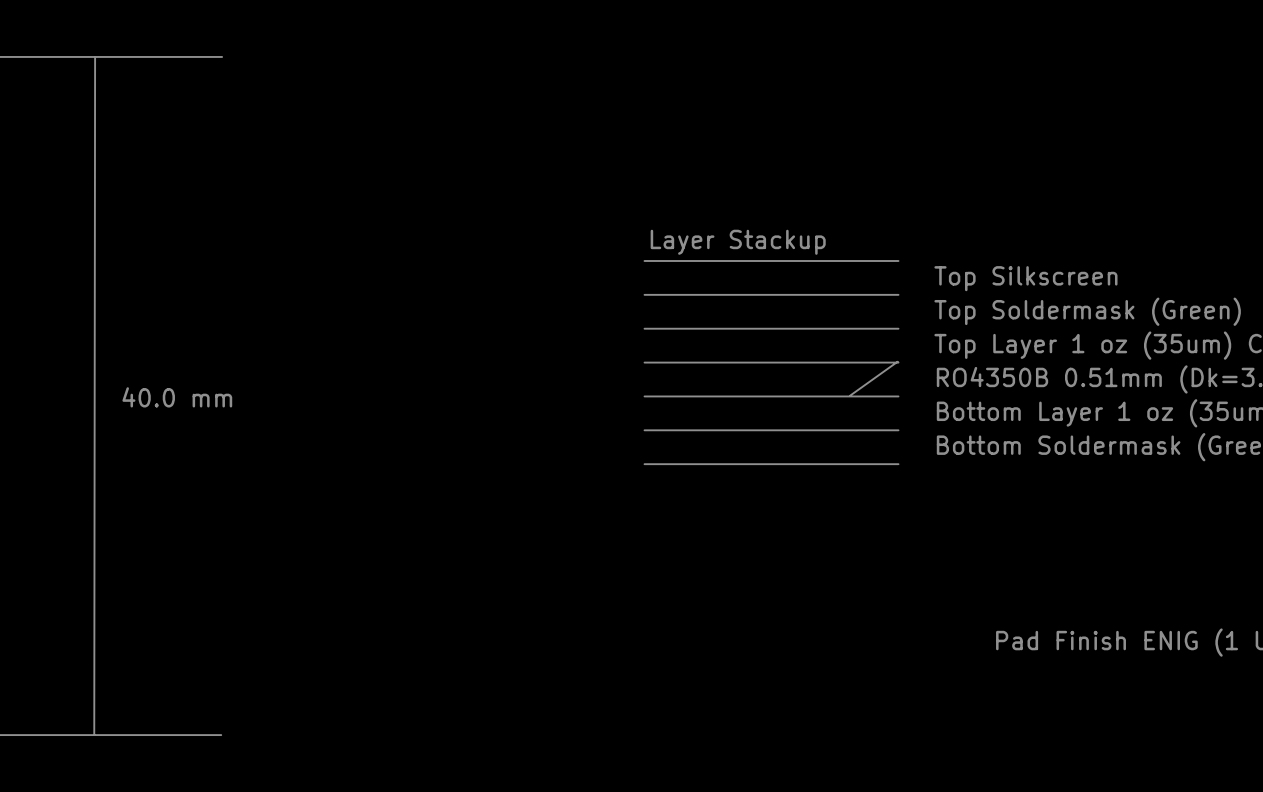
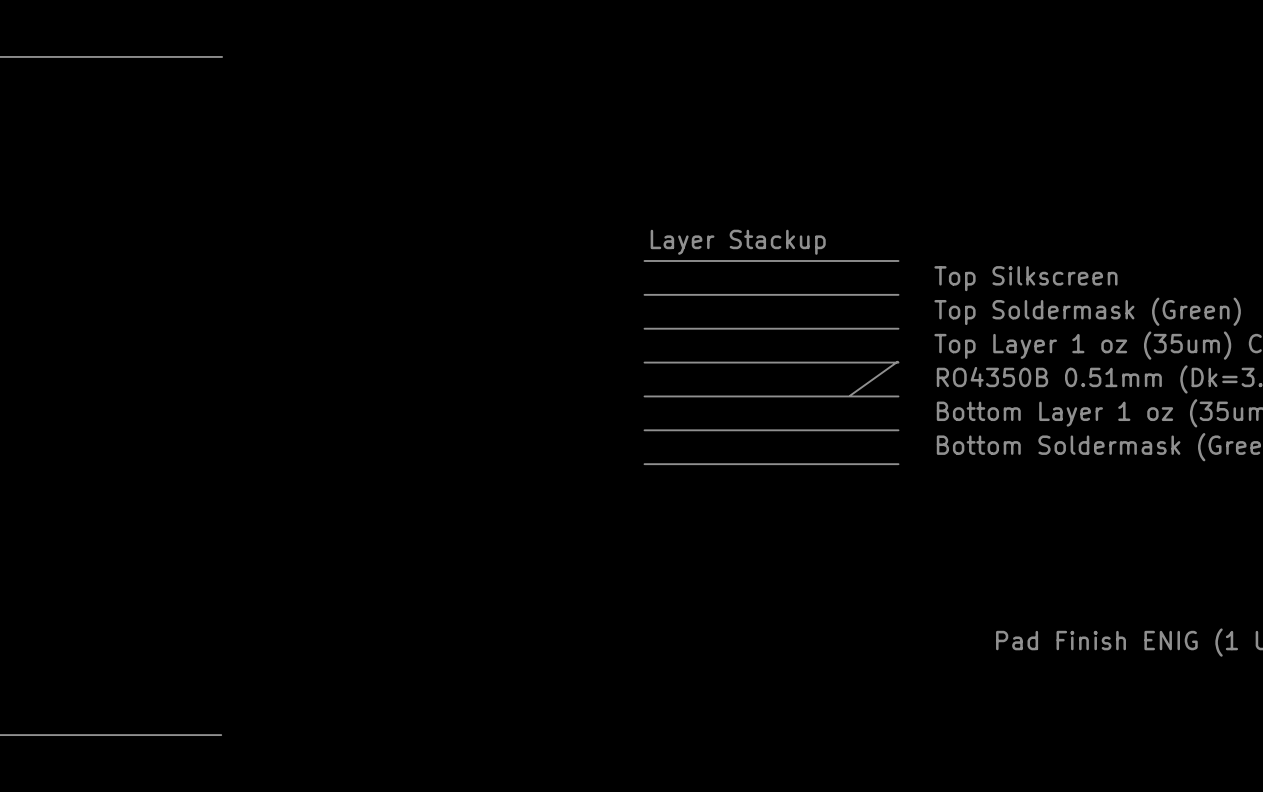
line: (95, 56) (94, 735) -> none
text: 40.0 mm (177, 397) -> none

